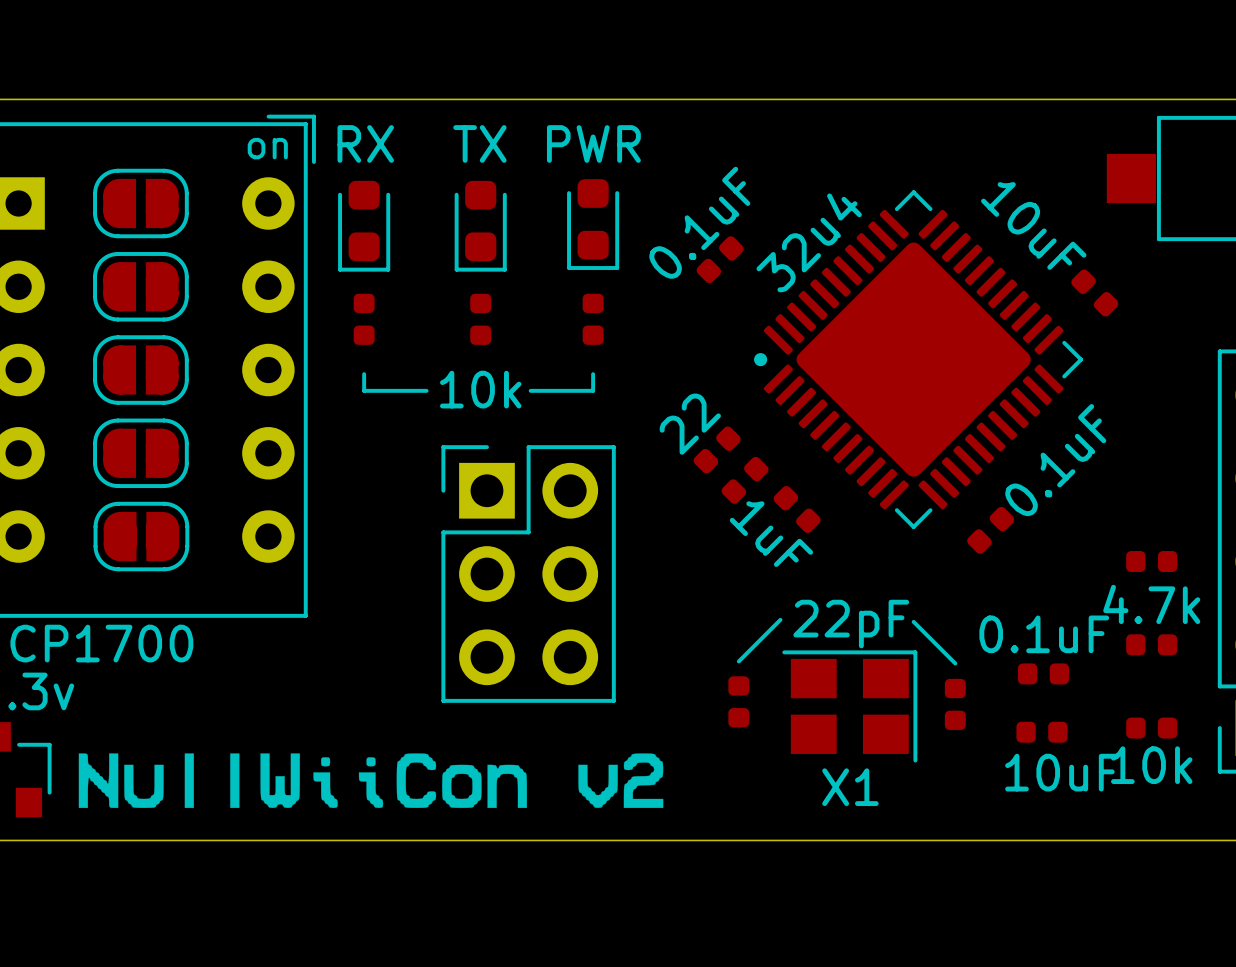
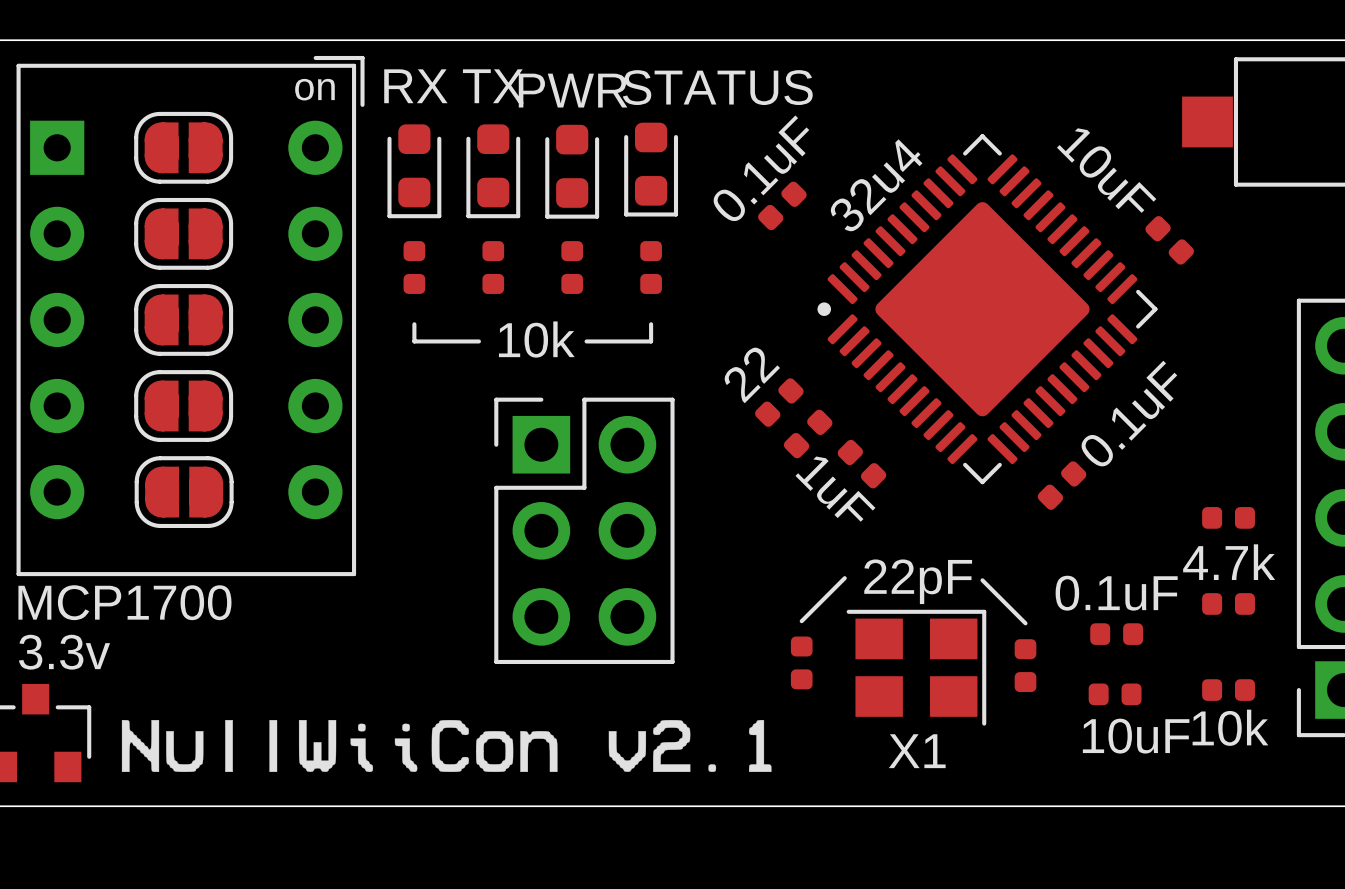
part value: PWR (593, 144) -> STATUS (717, 87)
part footprint: [754, 190, 1084, 529] -> [817, 134, 1158, 485]
part position: (480, 226) -> (493, 171)
part: none -> PWR (572, 171)
part: none -> (493, 267)
part: (480, 319) -> none
part: none -> (572, 267)
drawing shape: [78, 753, 664, 809] -> [121, 720, 772, 772]

